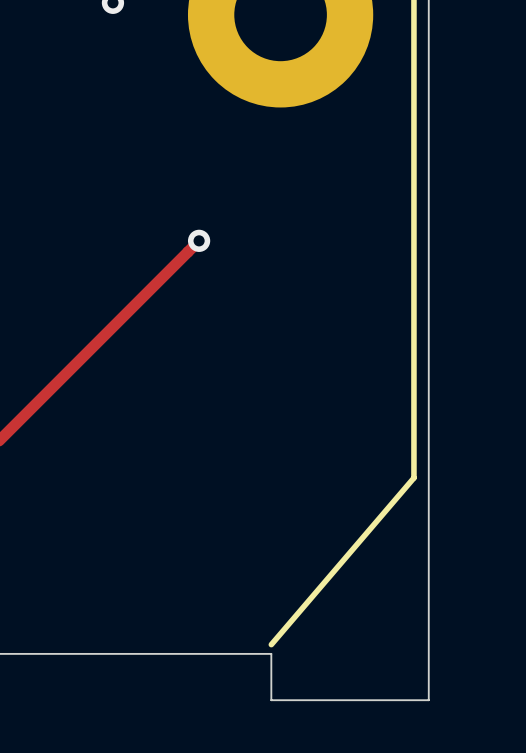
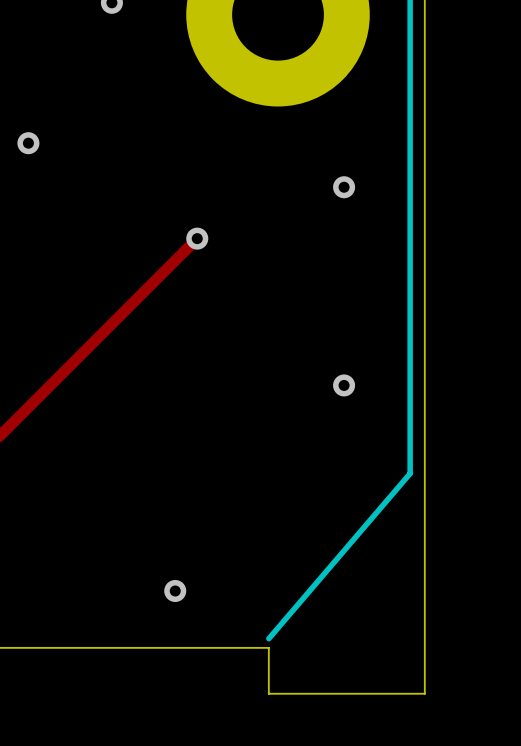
via: none -> (28, 143)
via: none -> (344, 187)
via: none -> (344, 385)
via: none -> (175, 590)

